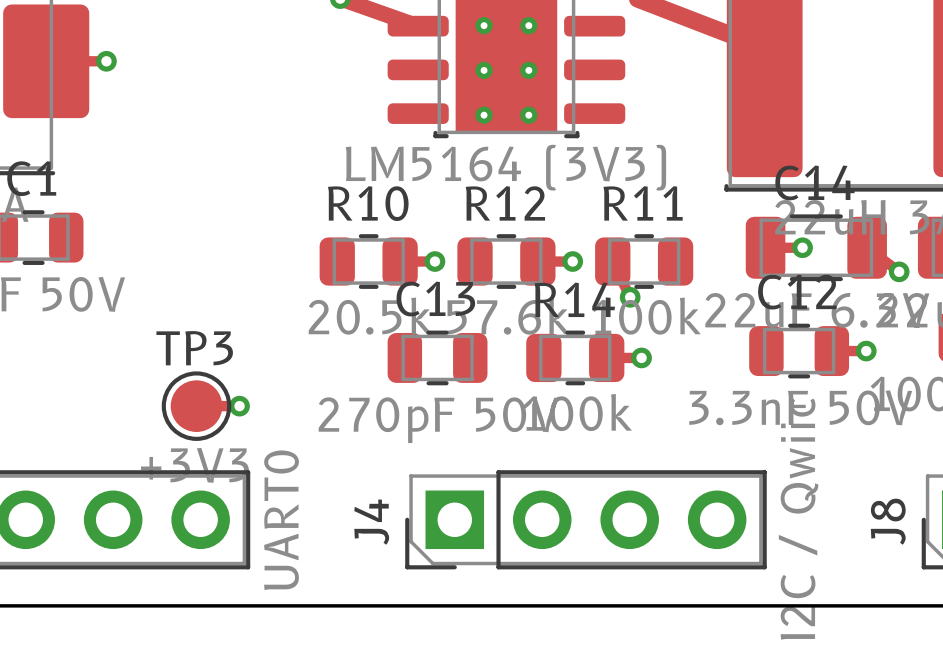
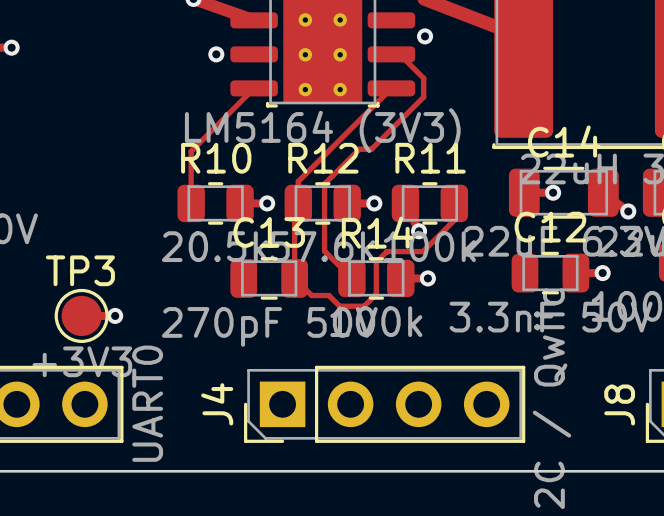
via: none -> (425, 36)
via: none -> (216, 54)
track: none -> (391, 54) (399, 54) (423, 78) (423, 97) (371, 149) (359, 149) (324, 184) (324, 251) (351, 278)
track: none -> (254, 88) (191, 151) (191, 203)
track: none -> (391, 88) (298, 181) (298, 203) (294, 207) (294, 278) (311, 295) (328, 295) (339, 306) (364, 306) (376, 294) (376, 262) (387, 251) (423, 251) (454, 220) (454, 203)

